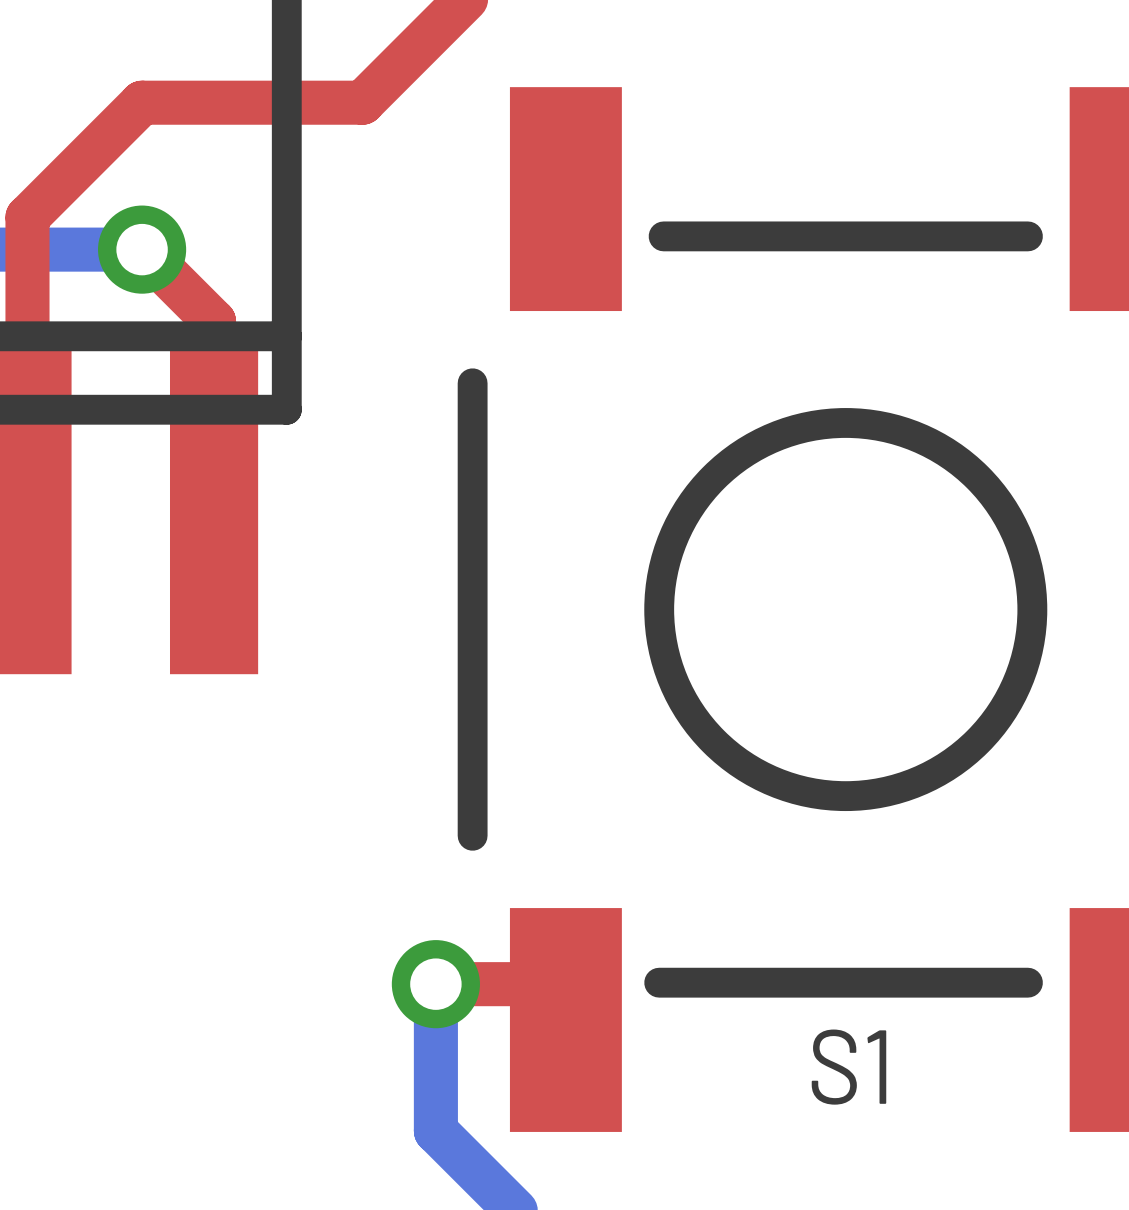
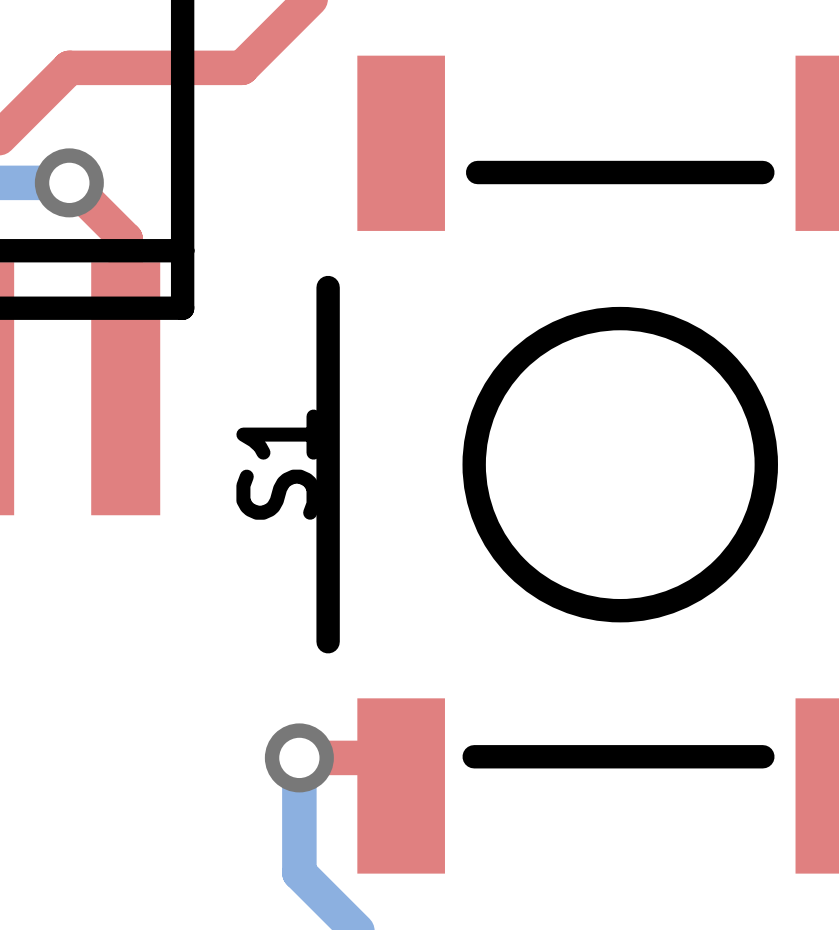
S1 name rotation: 0° (848, 1067) -> 90° counterclockwise (278, 464)
S1 name position: S1 (848, 1067) -> S1 (278, 464)

